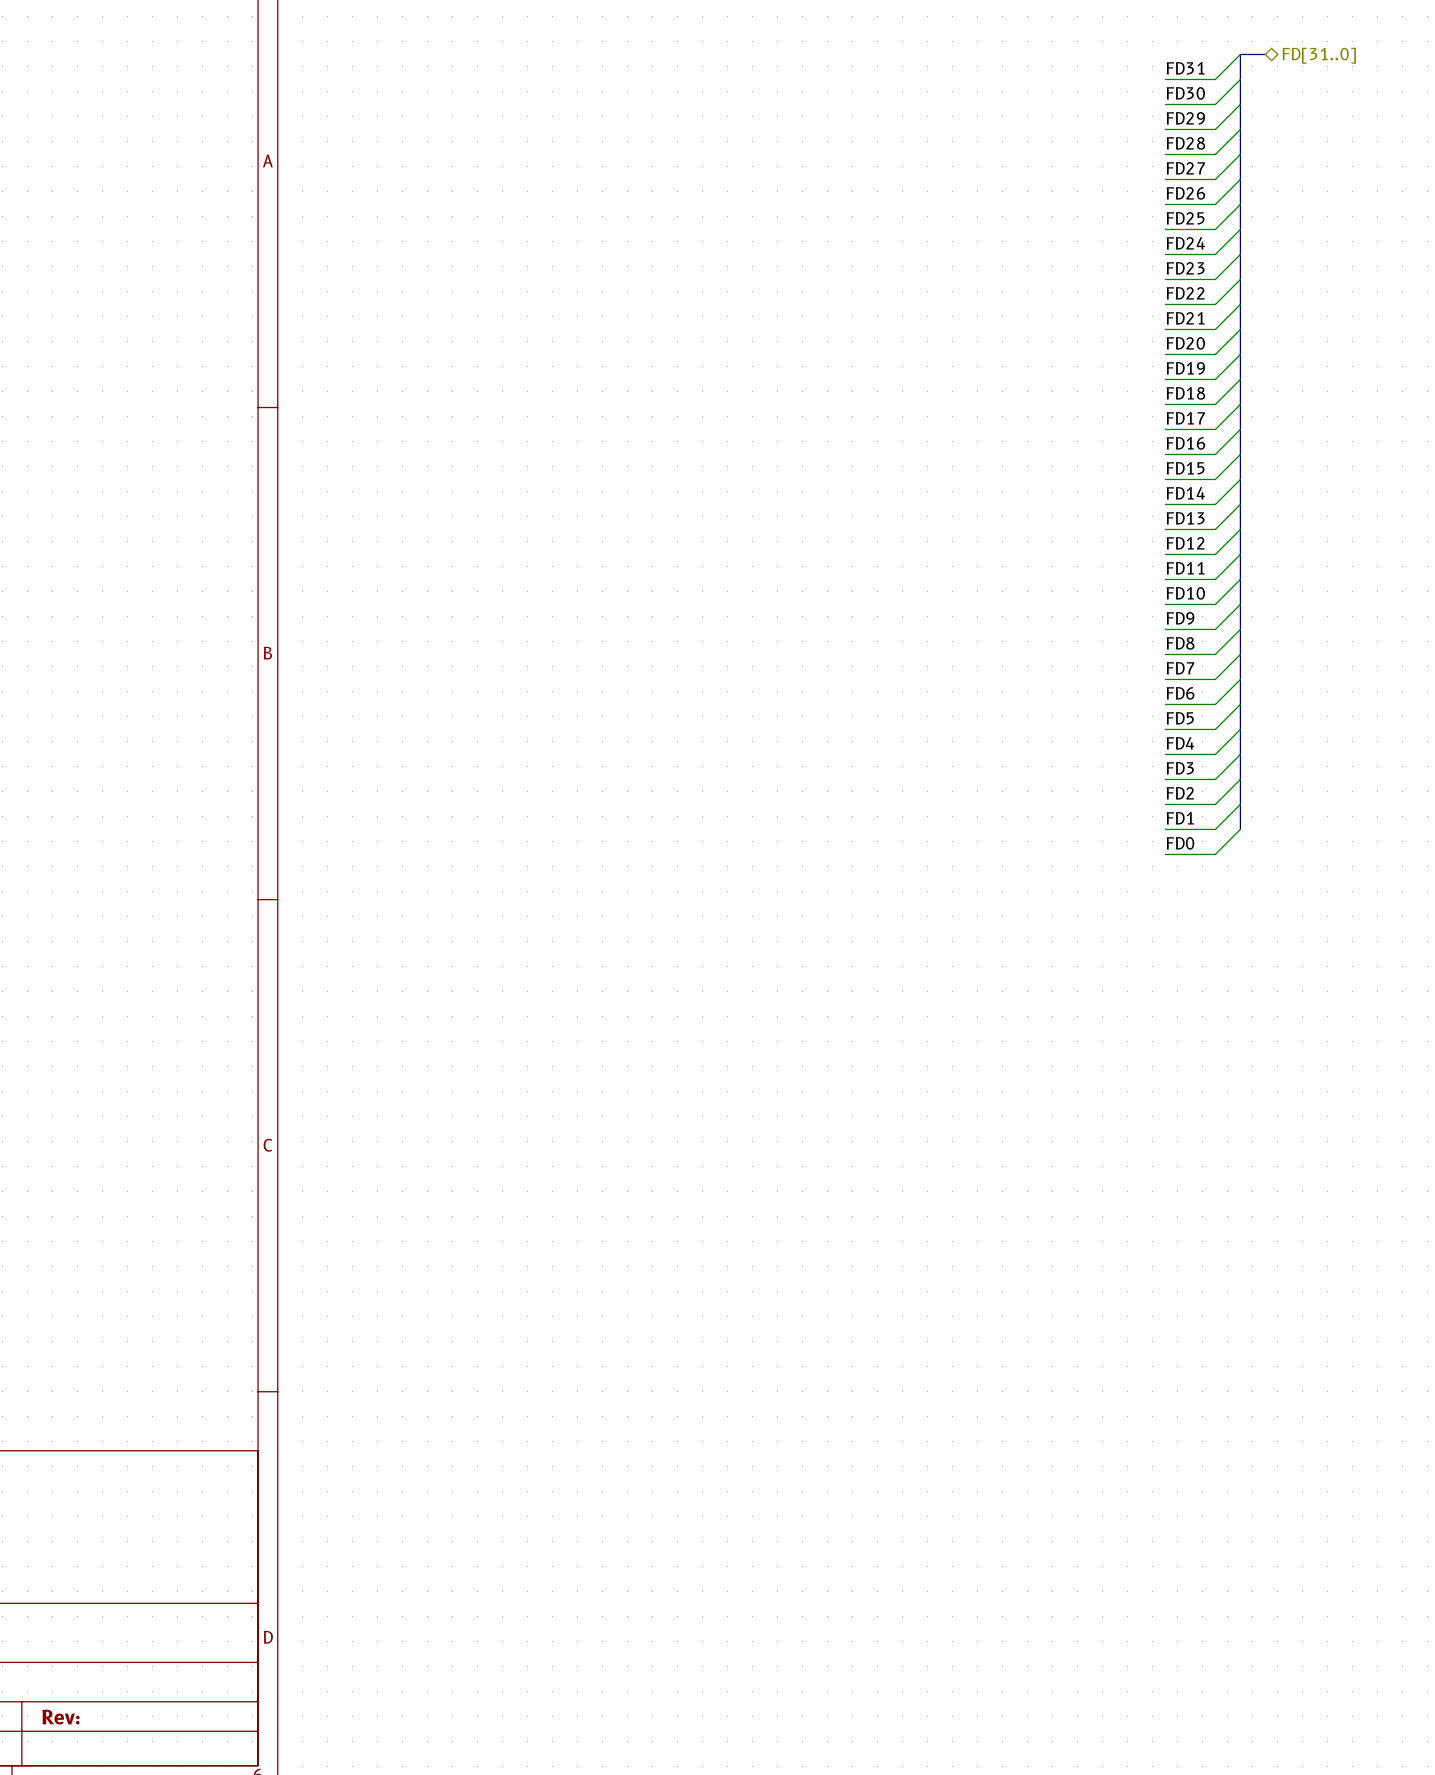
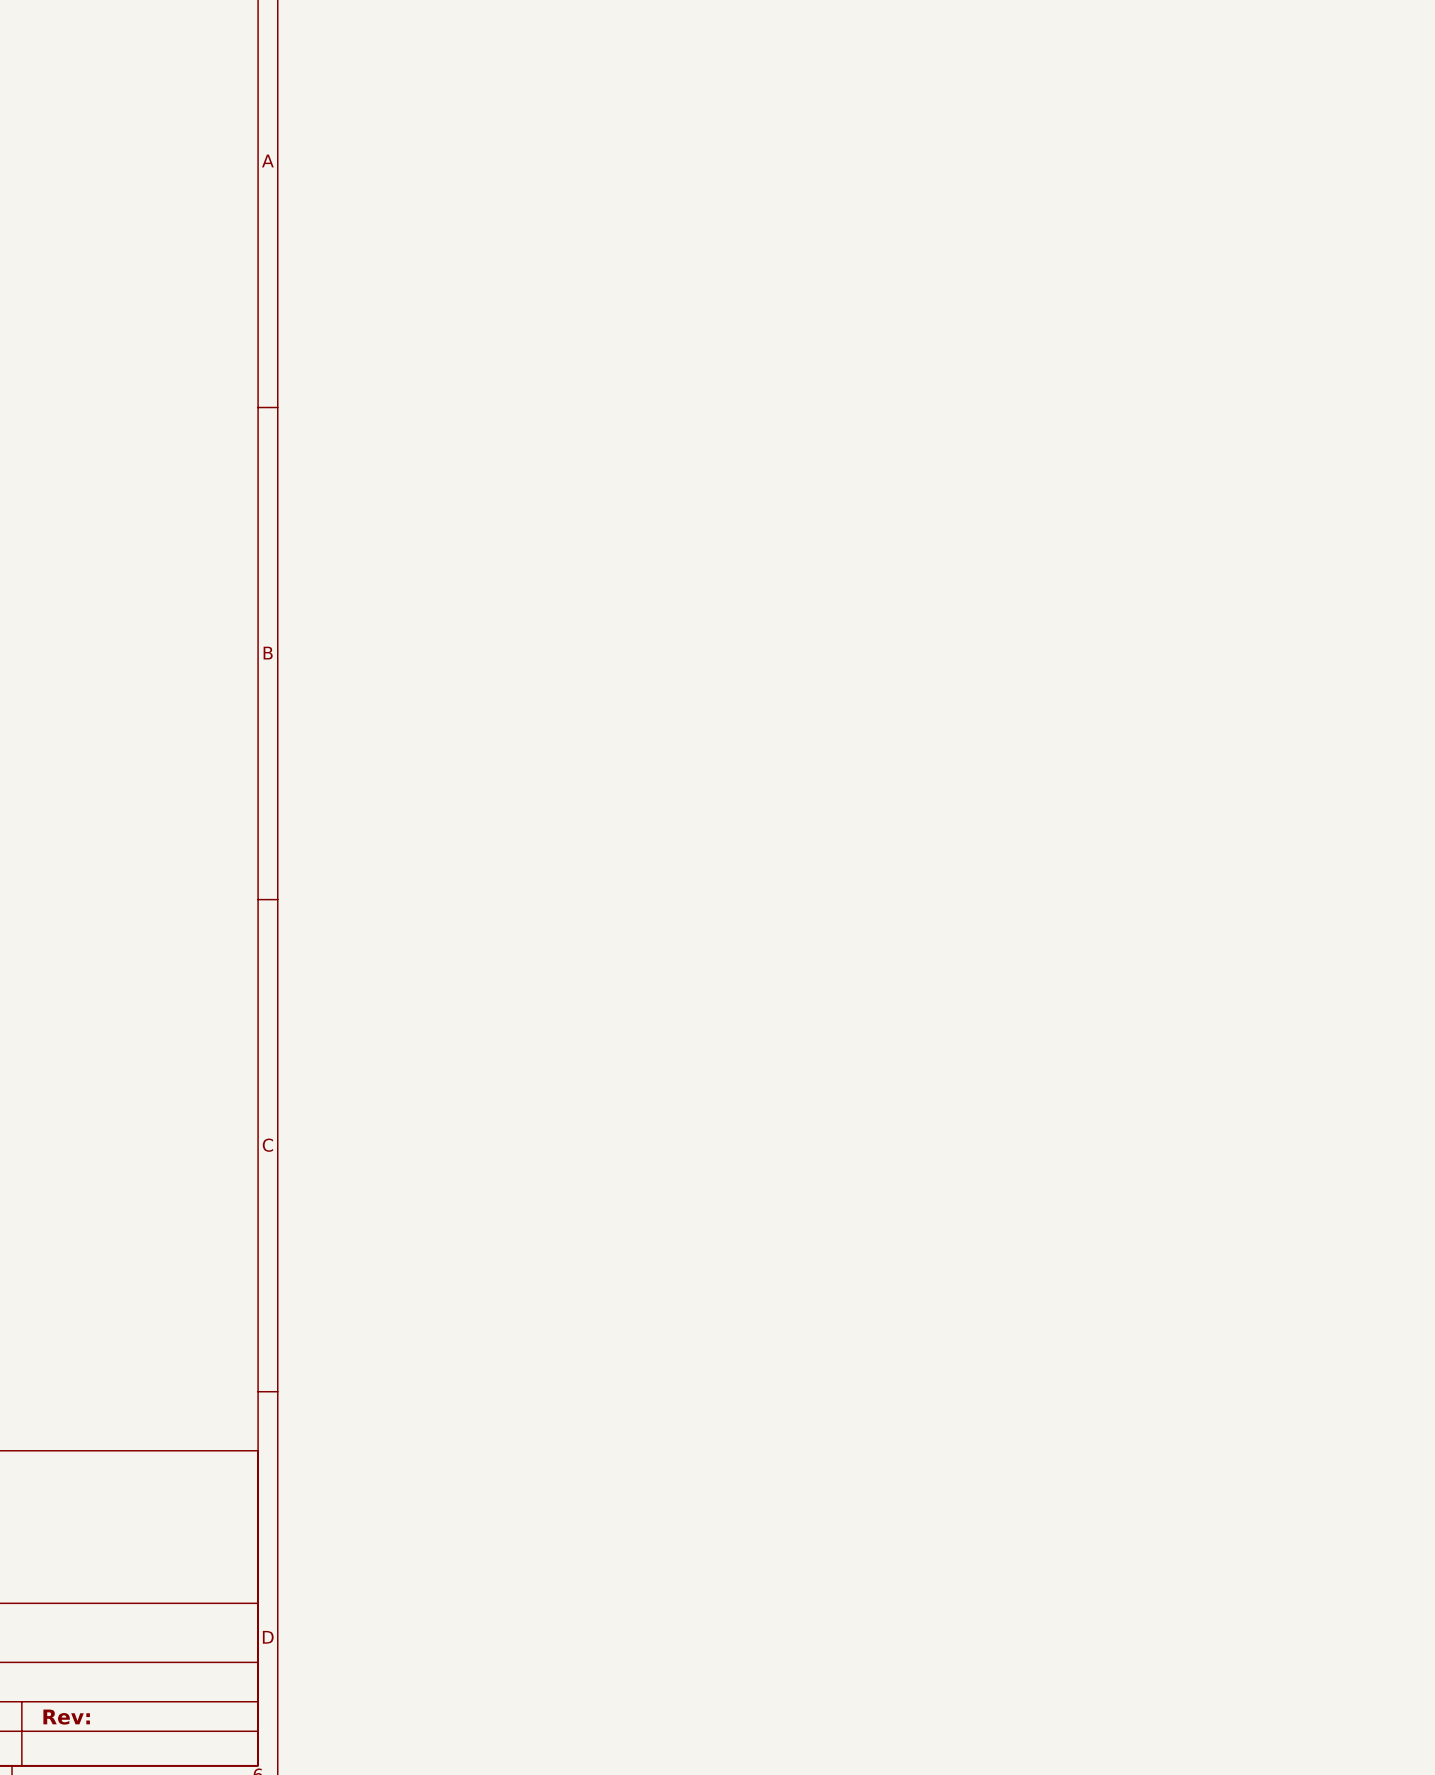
wire: (1240, 54) (1215, 79) (1165, 79) -> none
bus: (1265, 54) (1240, 54) (1240, 829) -> none
hierarchical label: FD[31..0] (1319, 55) -> none
label: FD31 (1185, 68) -> none
wire: (1240, 79) (1215, 104) (1165, 104) -> none
label: FD30 (1185, 93) -> none
wire: (1240, 104) (1215, 129) (1165, 129) -> none
label: FD29 (1185, 118) -> none
wire: (1240, 129) (1215, 154) (1165, 154) -> none
label: FD28 (1185, 143) -> none
wire: (1240, 154) (1215, 179) (1165, 179) -> none
label: FD27 (1185, 168) -> none
wire: (1240, 179) (1215, 204) (1165, 204) -> none
label: FD26 (1185, 193) -> none
wire: (1240, 204) (1215, 229) (1165, 229) -> none
label: FD25 (1185, 218) -> none
wire: (1240, 229) (1215, 254) (1165, 254) -> none
label: FD24 (1185, 243) -> none
wire: (1240, 254) (1215, 279) (1165, 279) -> none
label: FD23 (1185, 268) -> none
wire: (1240, 279) (1215, 304) (1165, 304) -> none
label: FD22 (1185, 293) -> none
wire: (1240, 304) (1215, 329) (1165, 329) -> none
label: FD21 (1185, 318) -> none
wire: (1240, 329) (1215, 354) (1165, 354) -> none
label: FD20 (1185, 343) -> none
wire: (1240, 354) (1215, 379) (1165, 379) -> none
label: FD19 (1185, 368) -> none
wire: (1240, 379) (1215, 404) (1165, 404) -> none
label: FD18 (1185, 393) -> none
wire: (1240, 404) (1215, 429) (1165, 429) -> none
label: FD17 (1185, 418) -> none
wire: (1240, 429) (1215, 454) (1165, 454) -> none
label: FD16 (1185, 443) -> none
wire: (1240, 454) (1215, 479) (1165, 479) -> none
label: FD15 (1185, 468) -> none
wire: (1240, 479) (1215, 504) (1165, 504) -> none
label: FD14 (1185, 493) -> none
wire: (1240, 504) (1215, 529) (1165, 529) -> none
label: FD13 (1185, 518) -> none
wire: (1240, 529) (1215, 554) (1165, 554) -> none
label: FD12 (1185, 543) -> none
wire: (1240, 554) (1215, 579) (1165, 579) -> none
label: FD11 (1185, 568) -> none
wire: (1240, 579) (1215, 604) (1165, 604) -> none
label: FD10 (1185, 593) -> none
wire: (1240, 604) (1215, 629) (1165, 629) -> none
label: FD9 (1180, 618) -> none
wire: (1240, 629) (1215, 654) (1165, 654) -> none
label: FD8 (1180, 643) -> none
wire: (1240, 654) (1215, 679) (1165, 679) -> none
label: FD7 (1180, 668) -> none
wire: (1240, 679) (1215, 704) (1165, 704) -> none
label: FD6 (1180, 693) -> none
wire: (1240, 704) (1215, 729) (1165, 729) -> none
label: FD5 (1180, 718) -> none
wire: (1240, 729) (1215, 754) (1165, 754) -> none
label: FD4 (1180, 743) -> none
wire: (1240, 754) (1215, 779) (1165, 779) -> none
label: FD3 (1180, 768) -> none
wire: (1240, 779) (1215, 804) (1165, 804) -> none
label: FD2 (1180, 793) -> none
wire: (1240, 804) (1215, 829) (1165, 829) -> none
label: FD1 (1180, 818) -> none
wire: (1240, 829) (1215, 854) (1165, 854) -> none
label: FD0 (1180, 843) -> none

